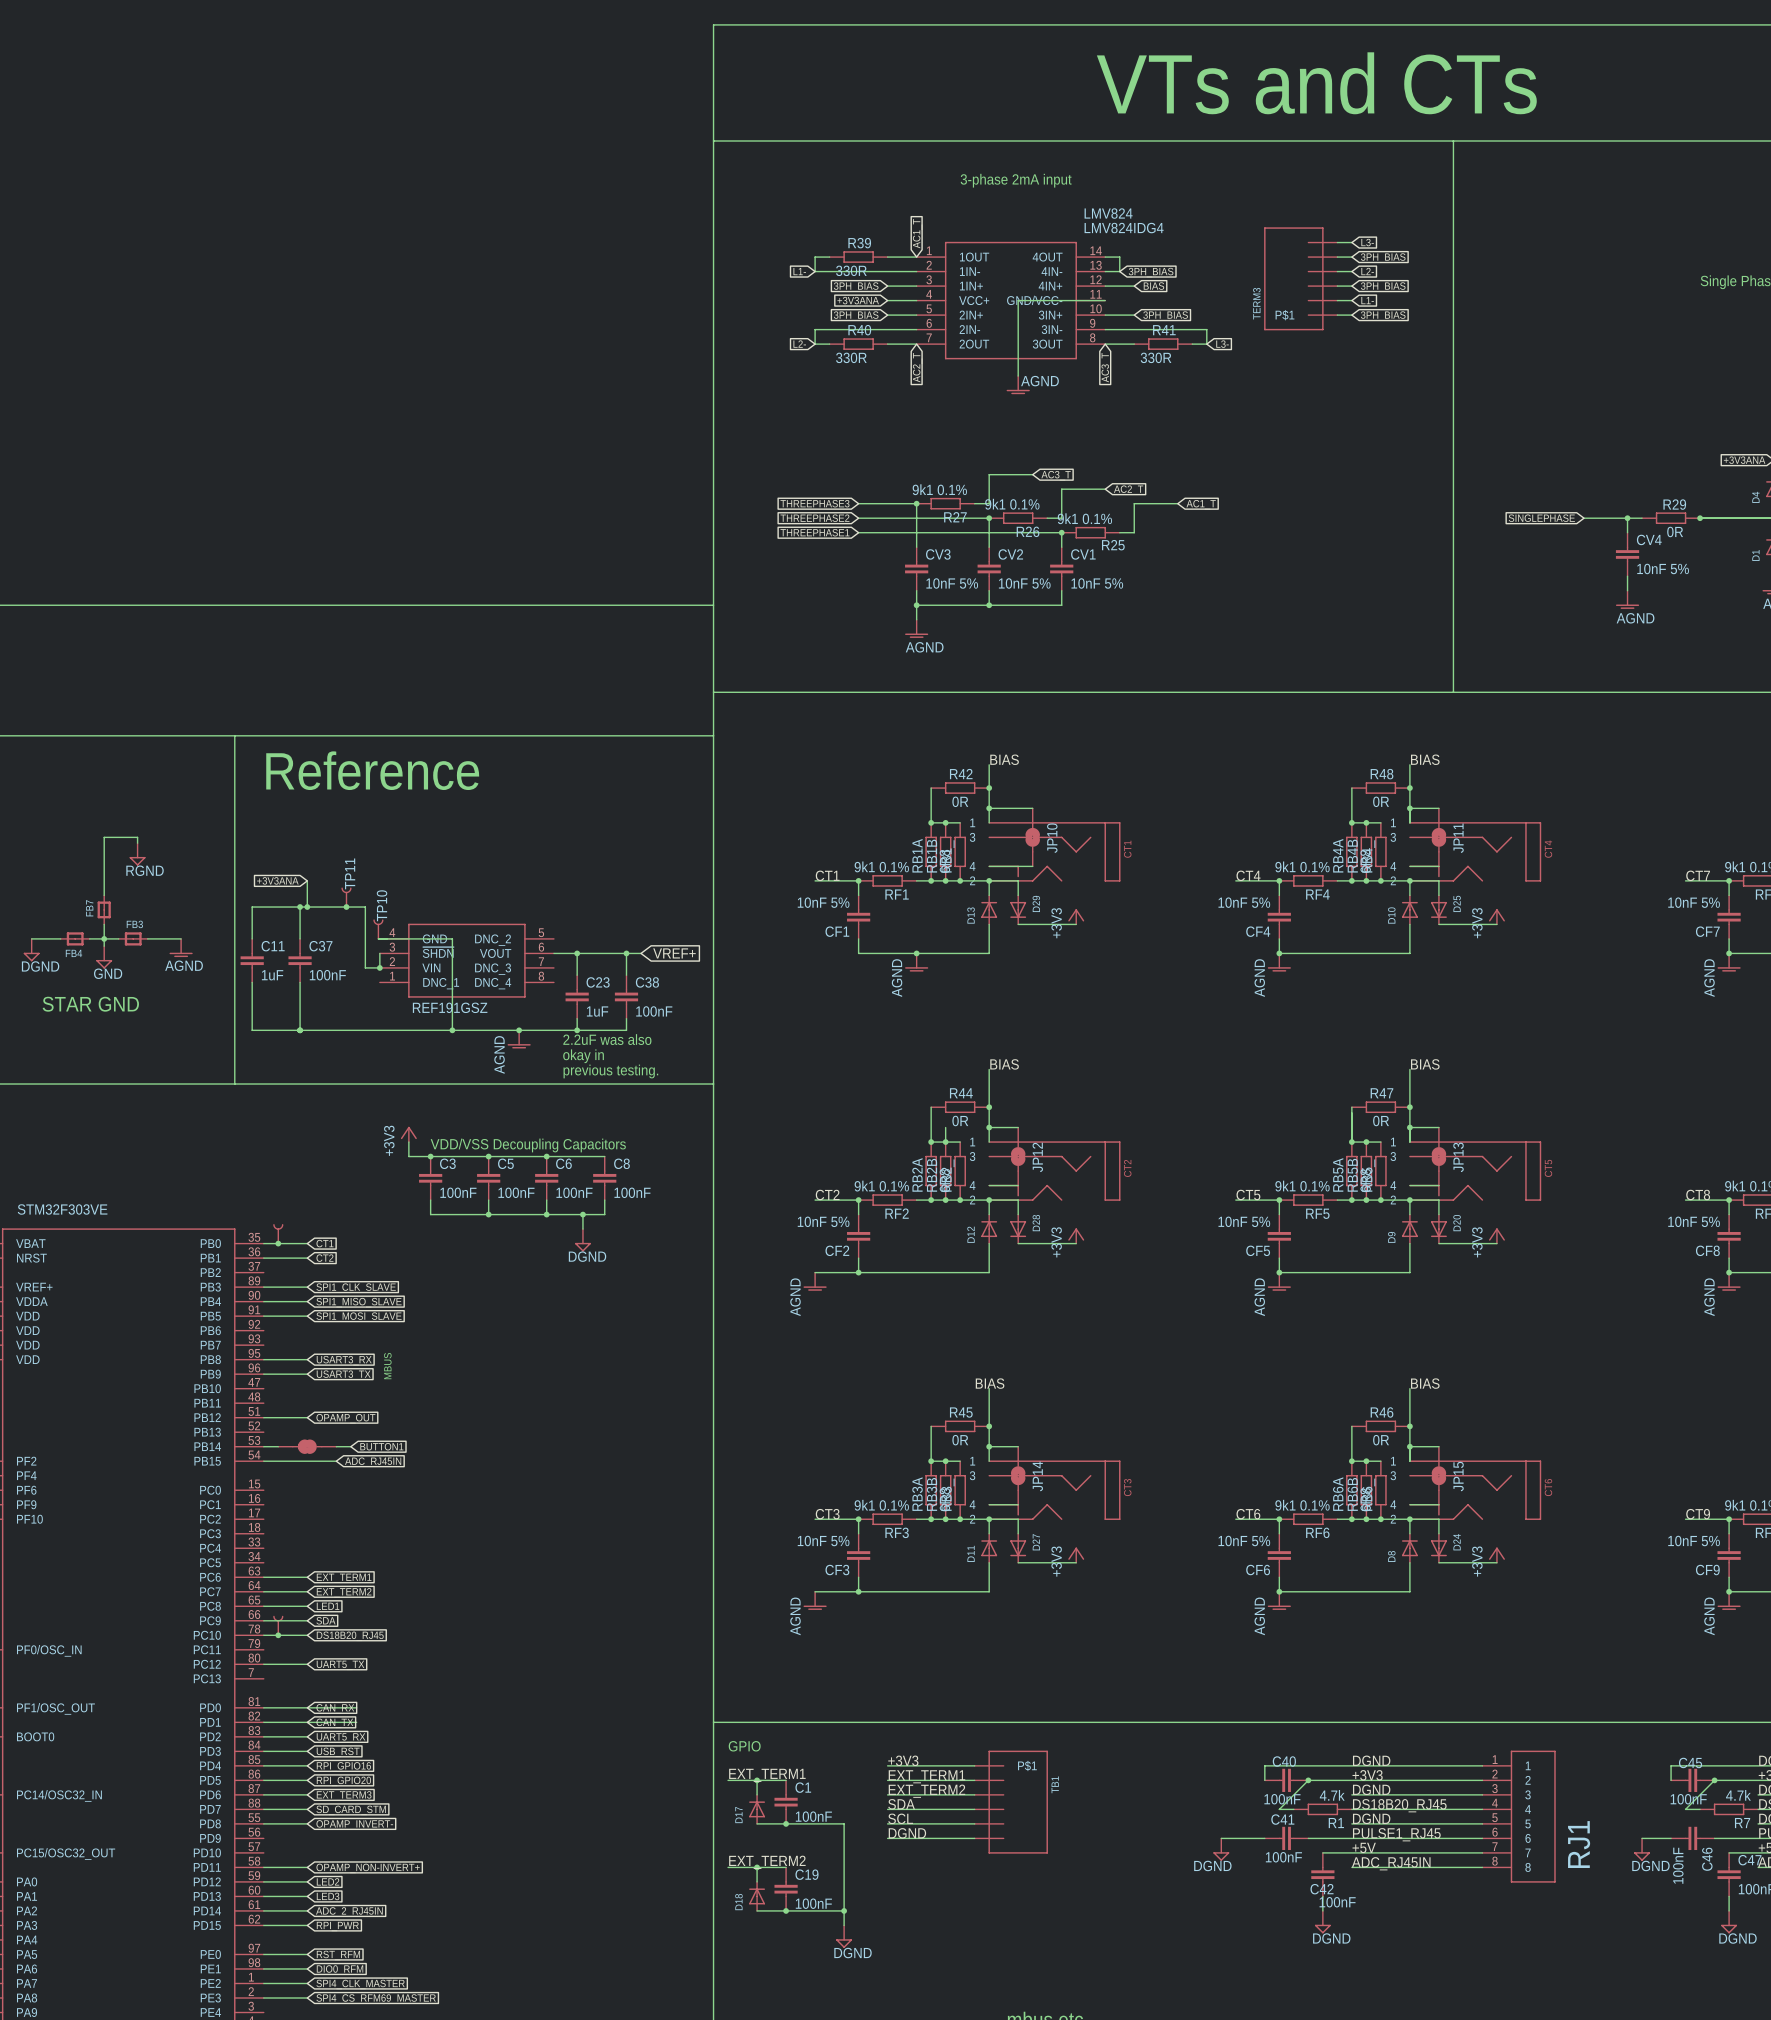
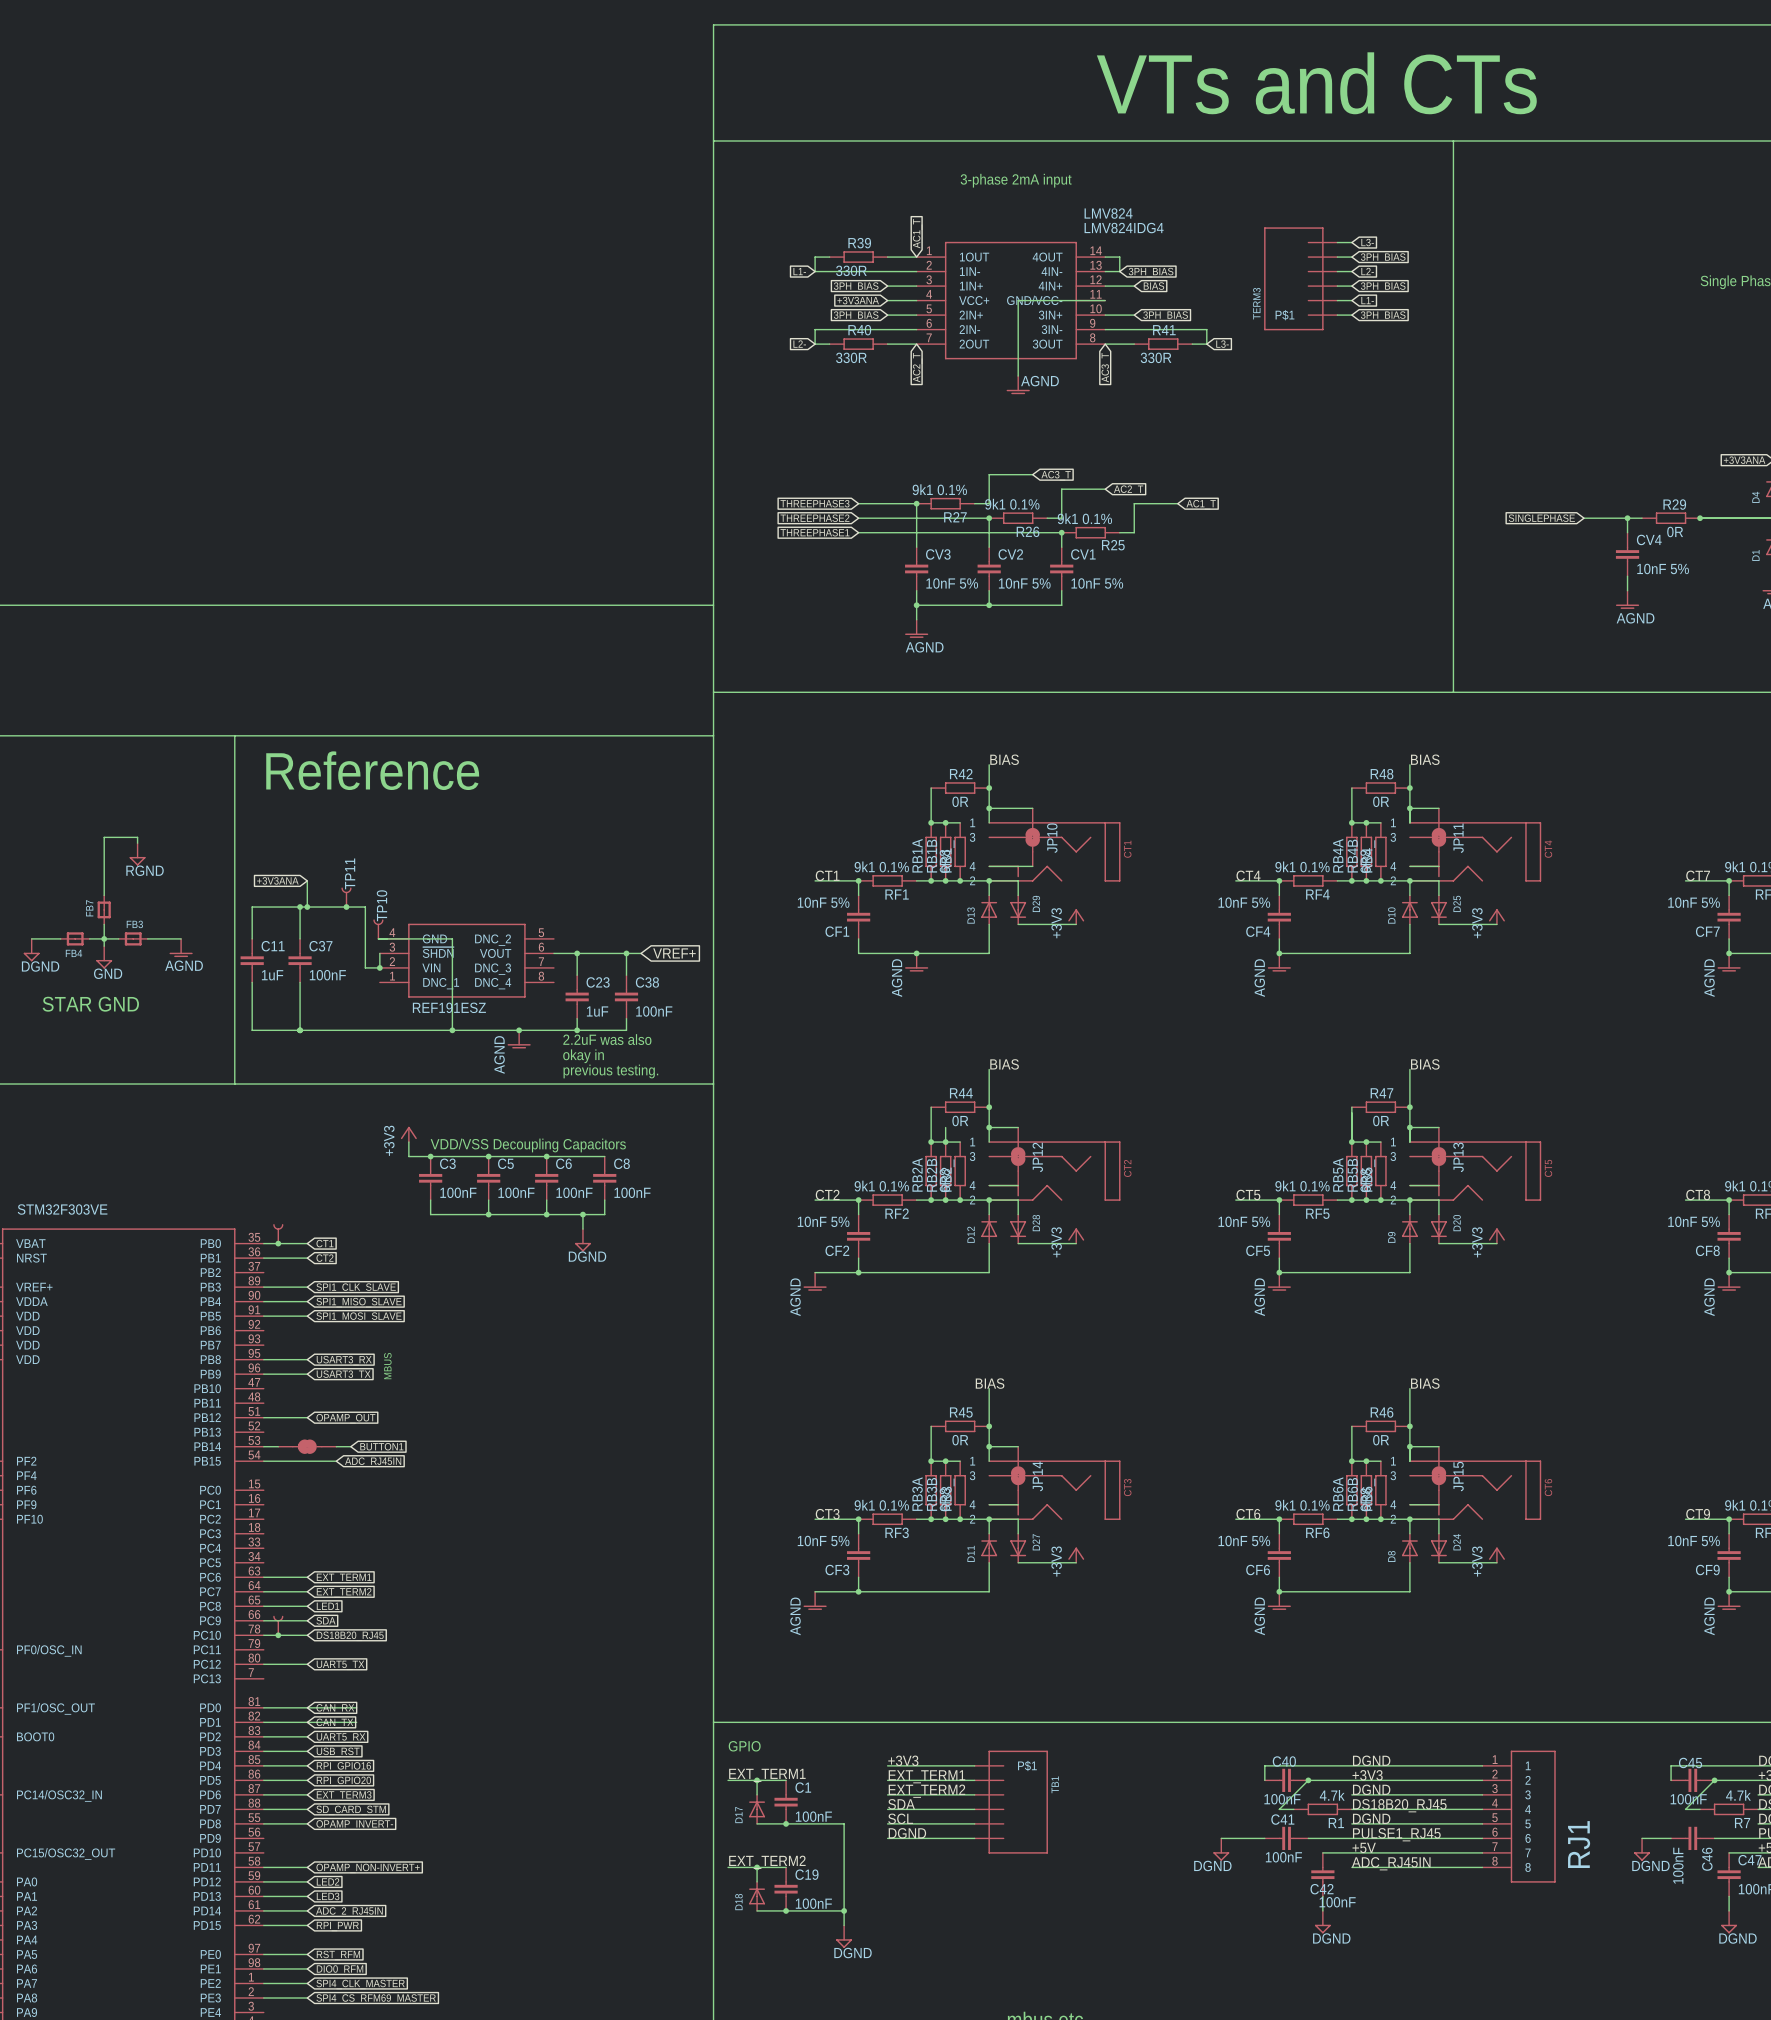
part text: REF191GSZ (450, 1007) -> REF191ESZ (449, 1007)

